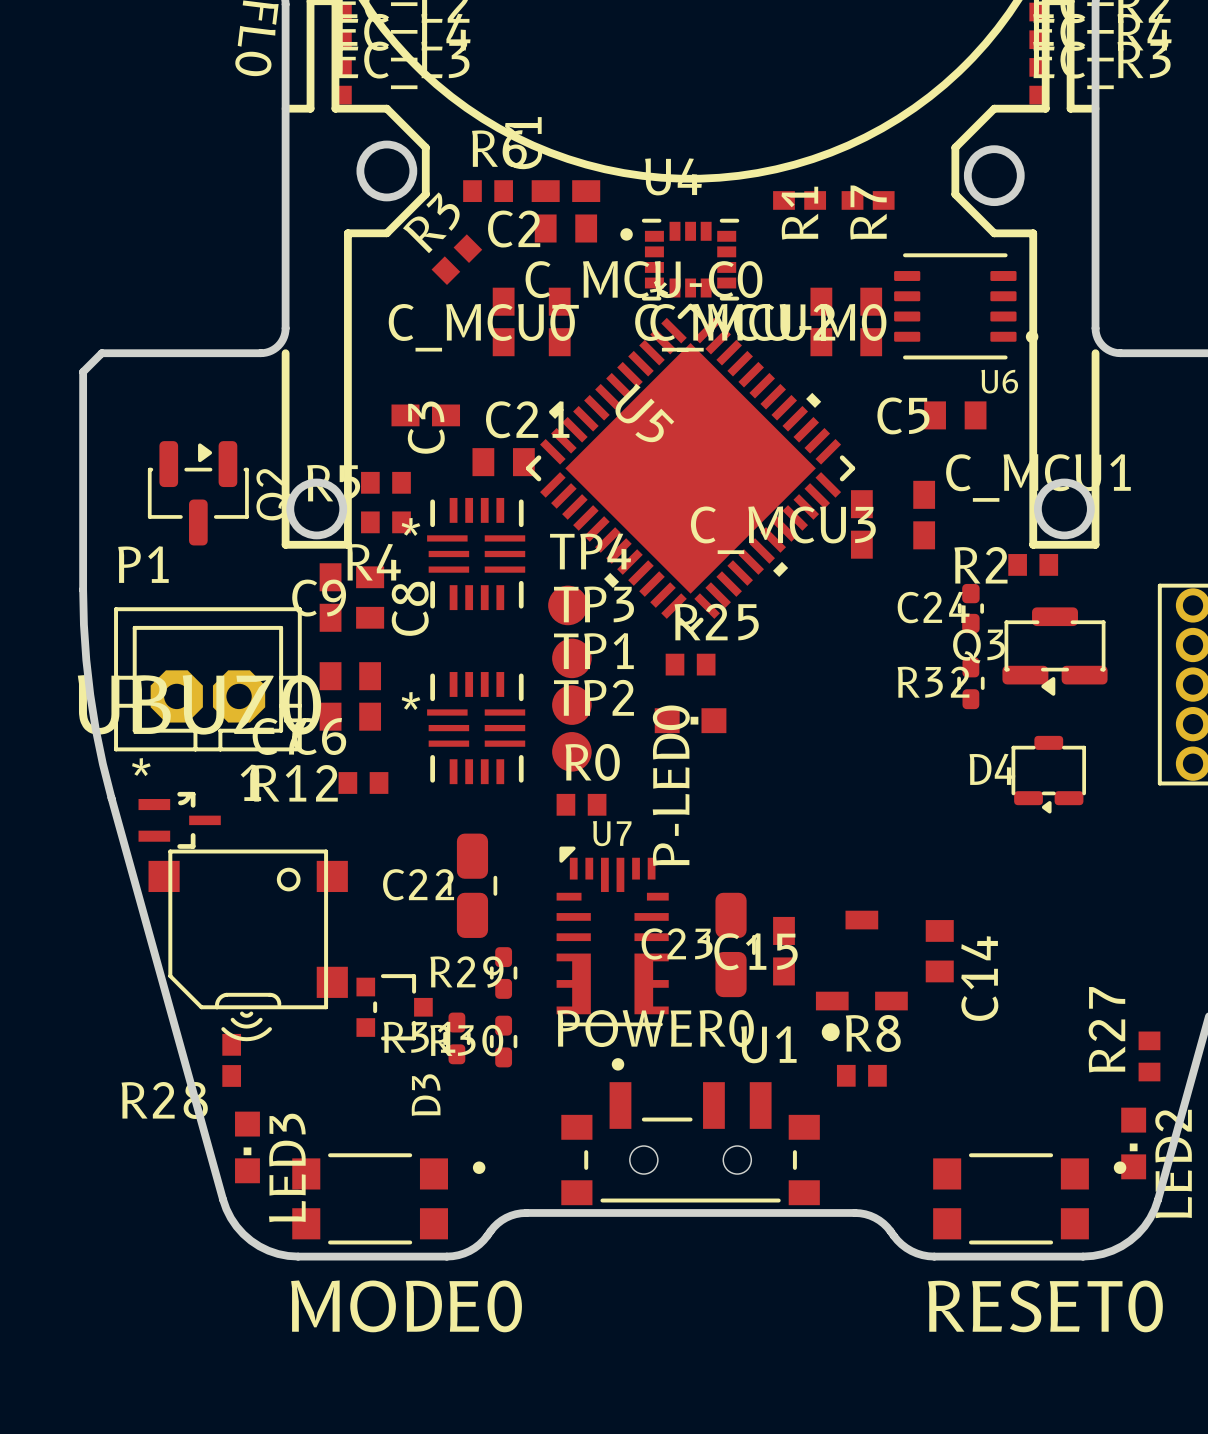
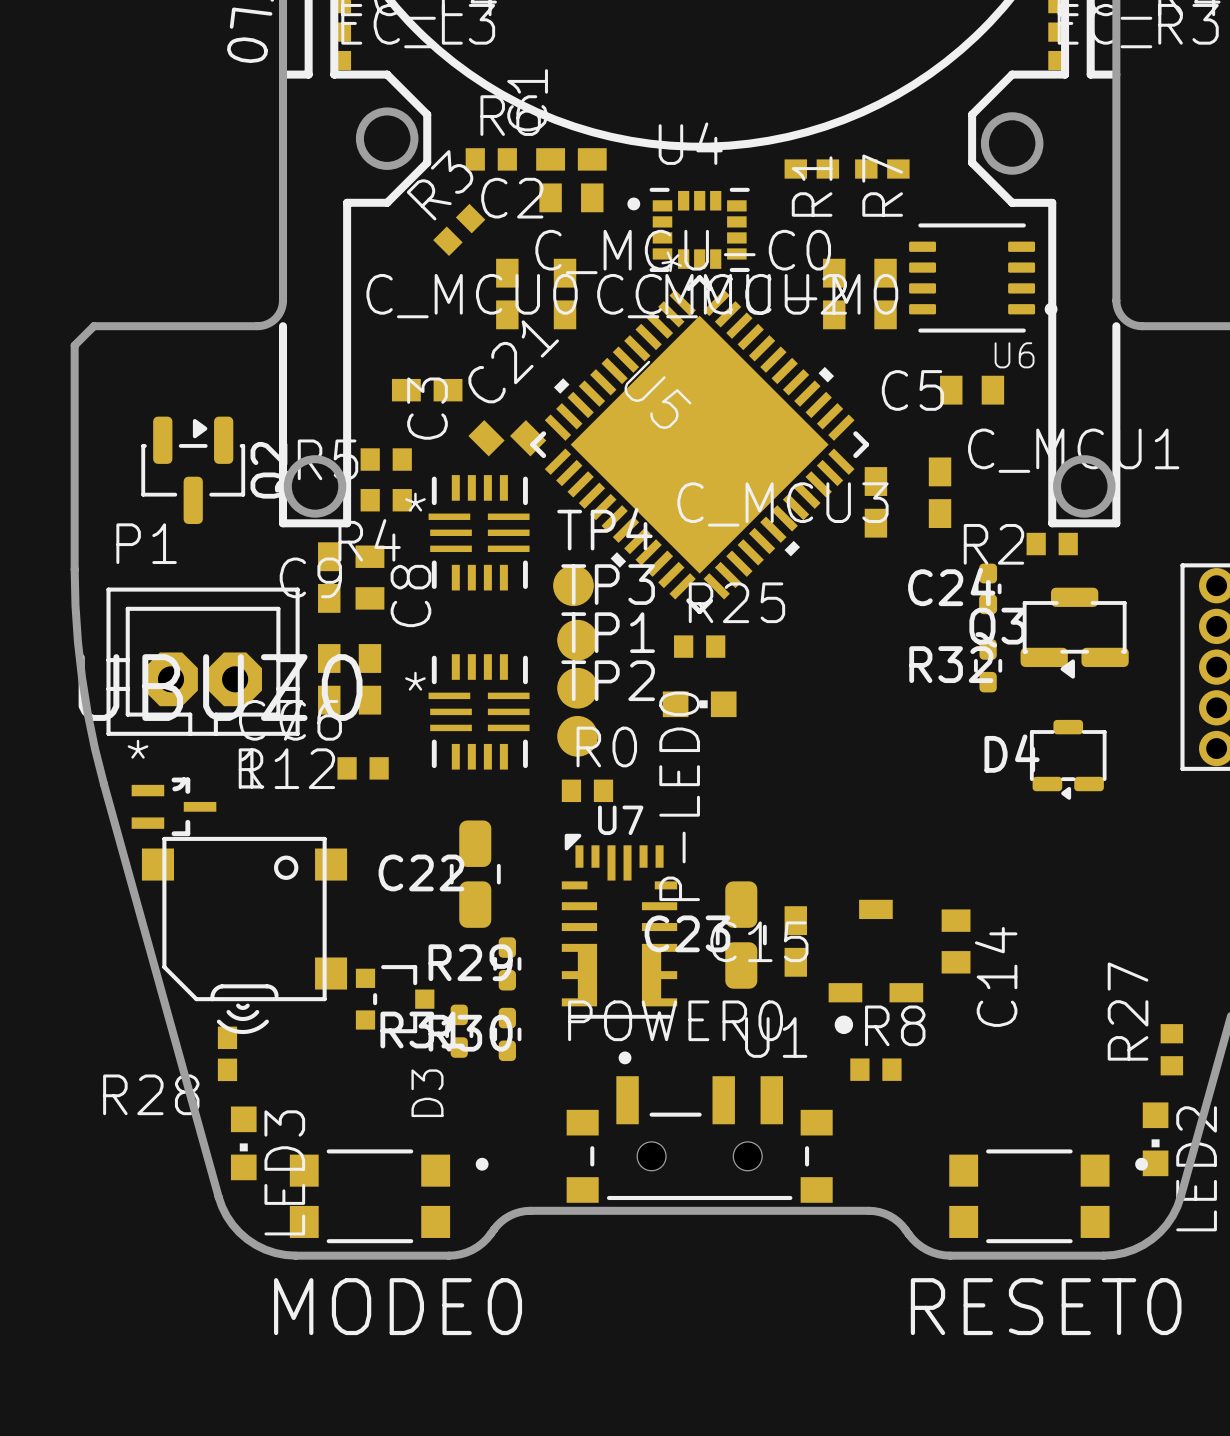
C21 name rotation: 0° (527, 419) -> 45° counterclockwise (513, 361)
C21 footprint: [472, 448, 535, 477] -> [468, 420, 547, 457]

